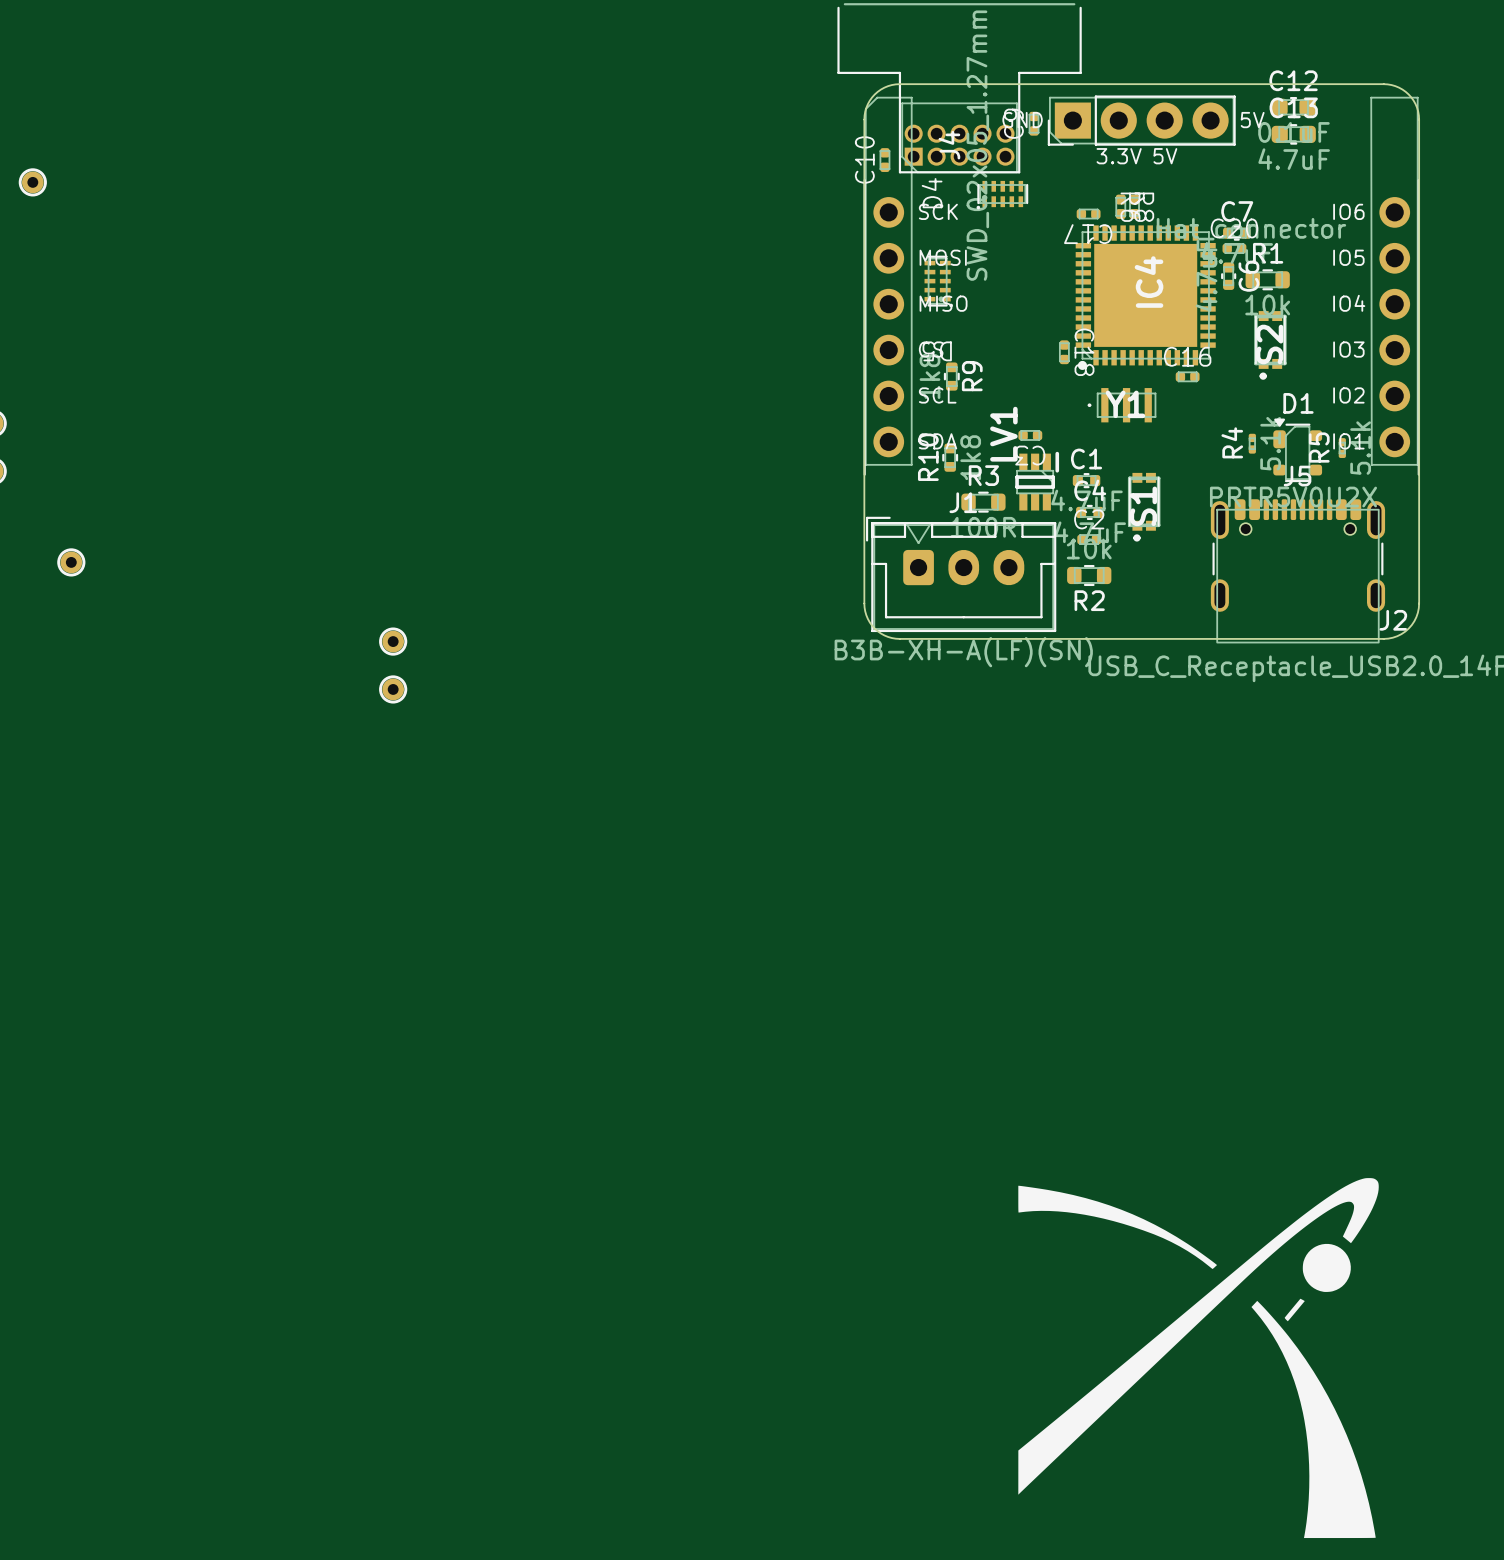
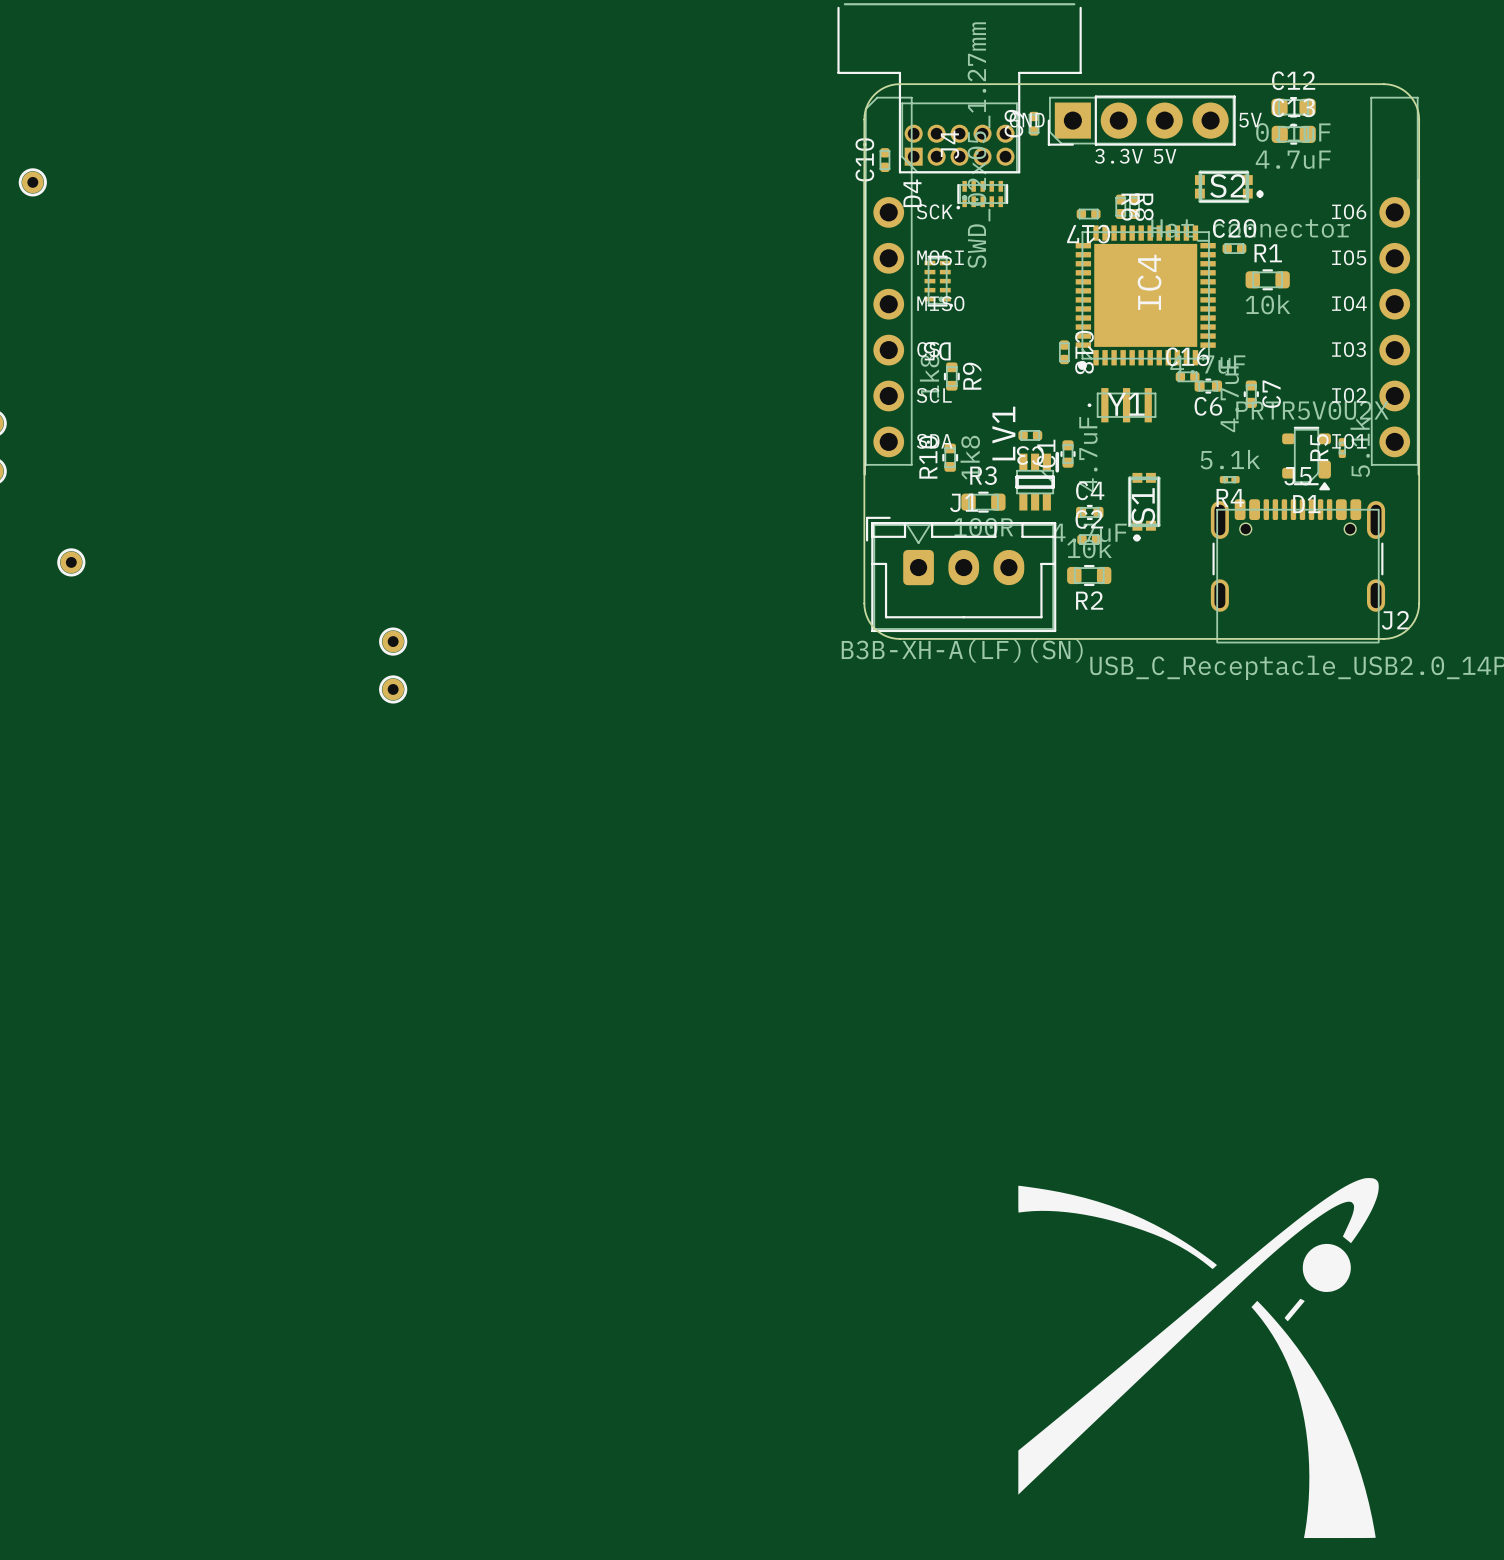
D4 position: (1002, 195) -> (982, 195)
C7 rotation: 0° (1236, 233) -> 90° clockwise (1251, 394)
C7 position: (1236, 233) -> (1251, 394)
C6 rotation: 0° (1228, 276) -> 90° clockwise (1208, 386)
C6 position: (1228, 276) -> (1208, 386)
S2 rotation: 0° (1270, 345) -> 90° counterclockwise (1229, 186)
S2 position: (1270, 345) -> (1229, 186)
R4 rotation: 0° (1252, 443) -> 90° clockwise (1229, 479)
R4 position: (1252, 443) -> (1229, 479)
D1 rotation: 0° (1297, 450) -> 180° (1306, 458)
C1 rotation: 0° (1086, 480) -> 90° clockwise (1068, 454)
C1 position: (1086, 480) -> (1068, 454)

